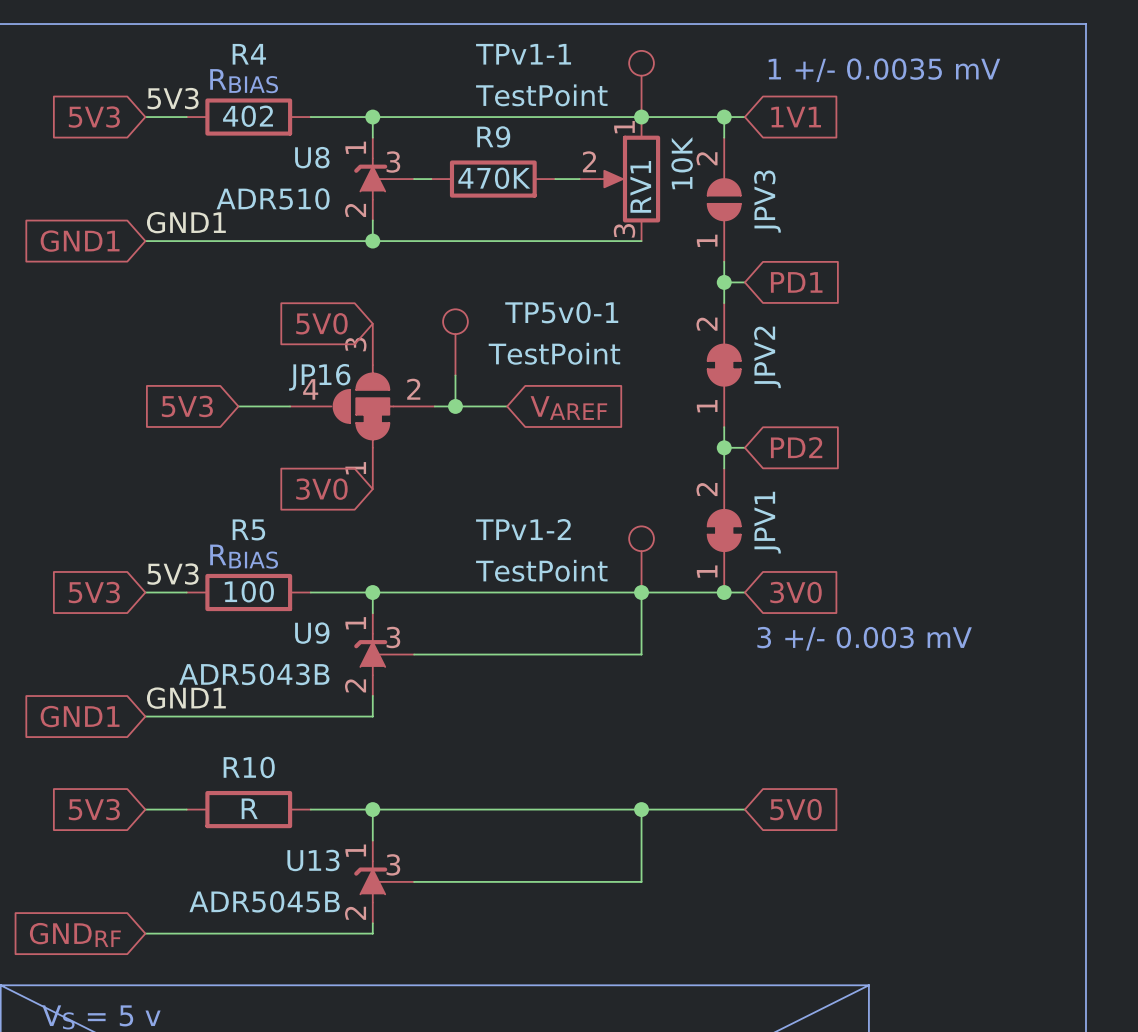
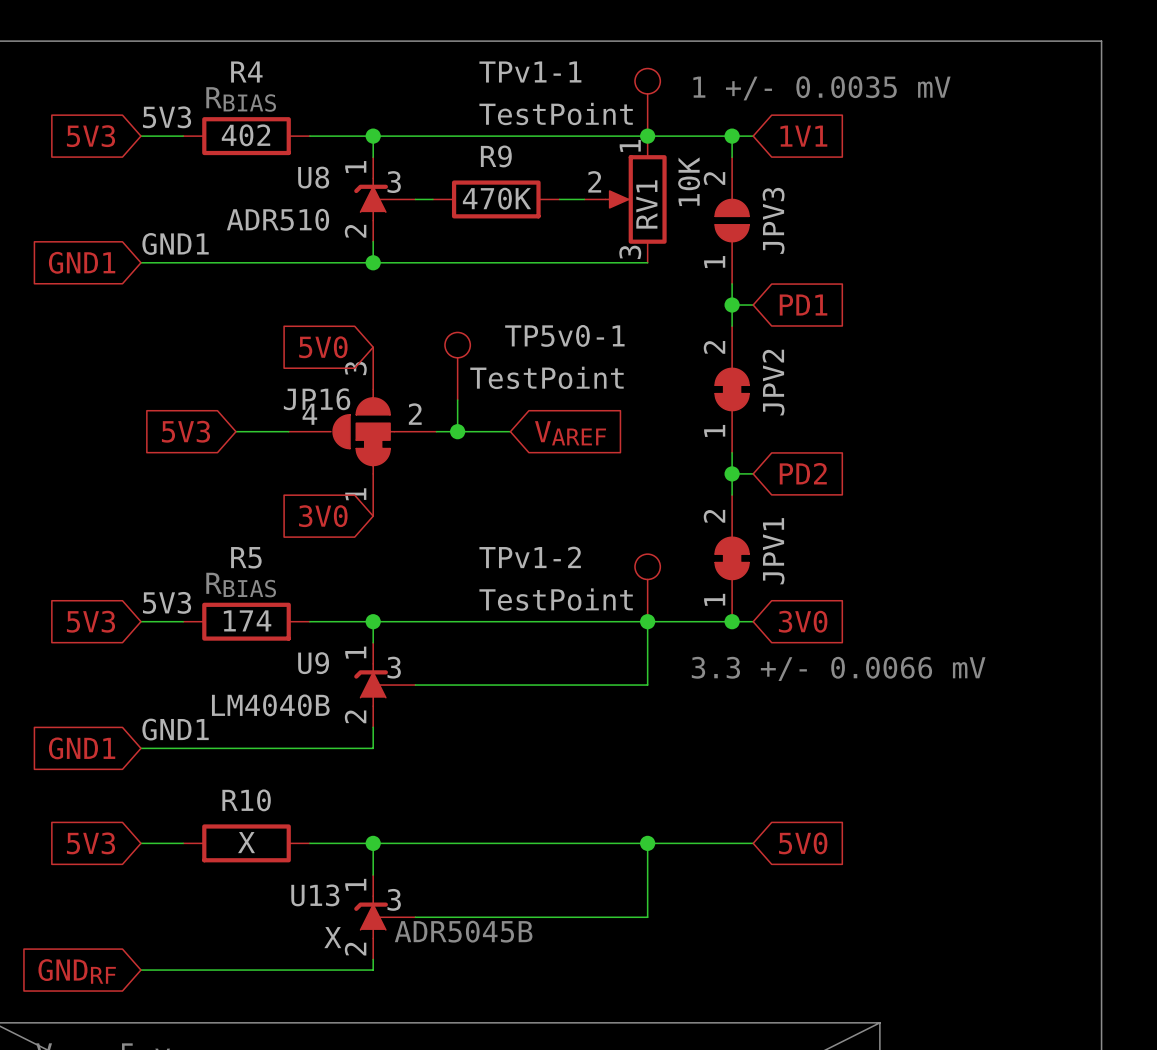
text position: 1 +/- 0.0035 mV (884, 70) -> 1 +/- 0.0035 mV (821, 88)
R5 value: 100 (249, 591) -> 174 (247, 620)
text: 3 +/- 0.003 mV (864, 638) -> 3.3 +/- 0.0066 mV (838, 668)
U9 value: ADR5043B (254, 674) -> LM4040B (270, 705)
R10 value: R (249, 808) -> X (246, 842)
text: none -> ADR5045B (463, 931)
U13 value: ADR5045B (264, 901) -> X (332, 937)

